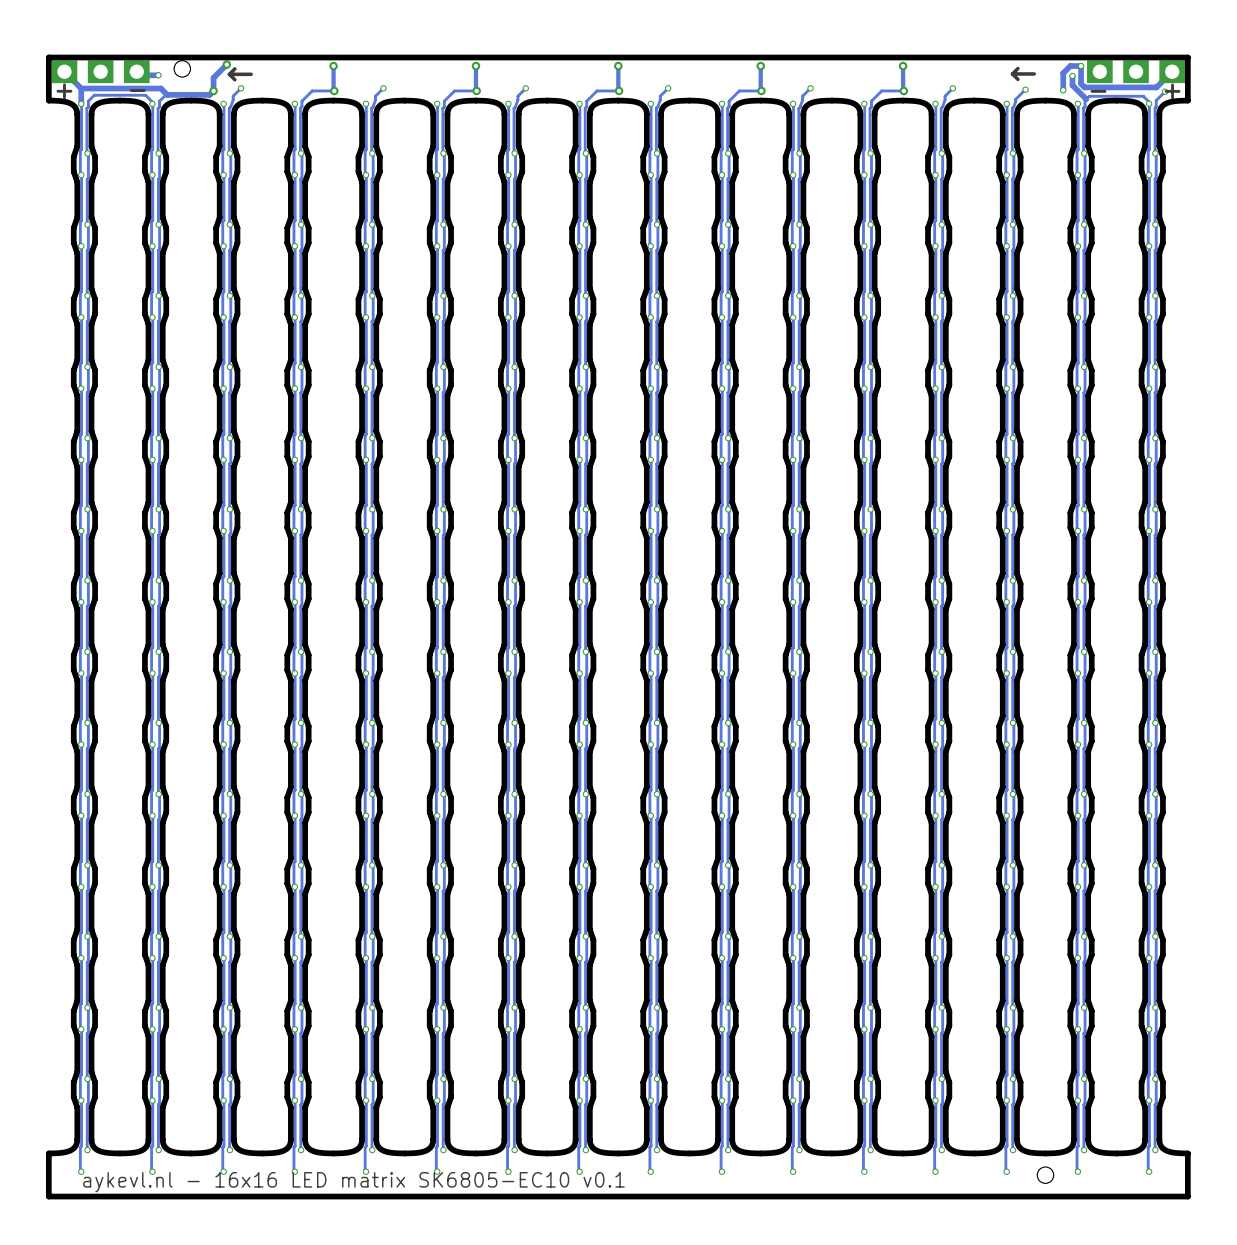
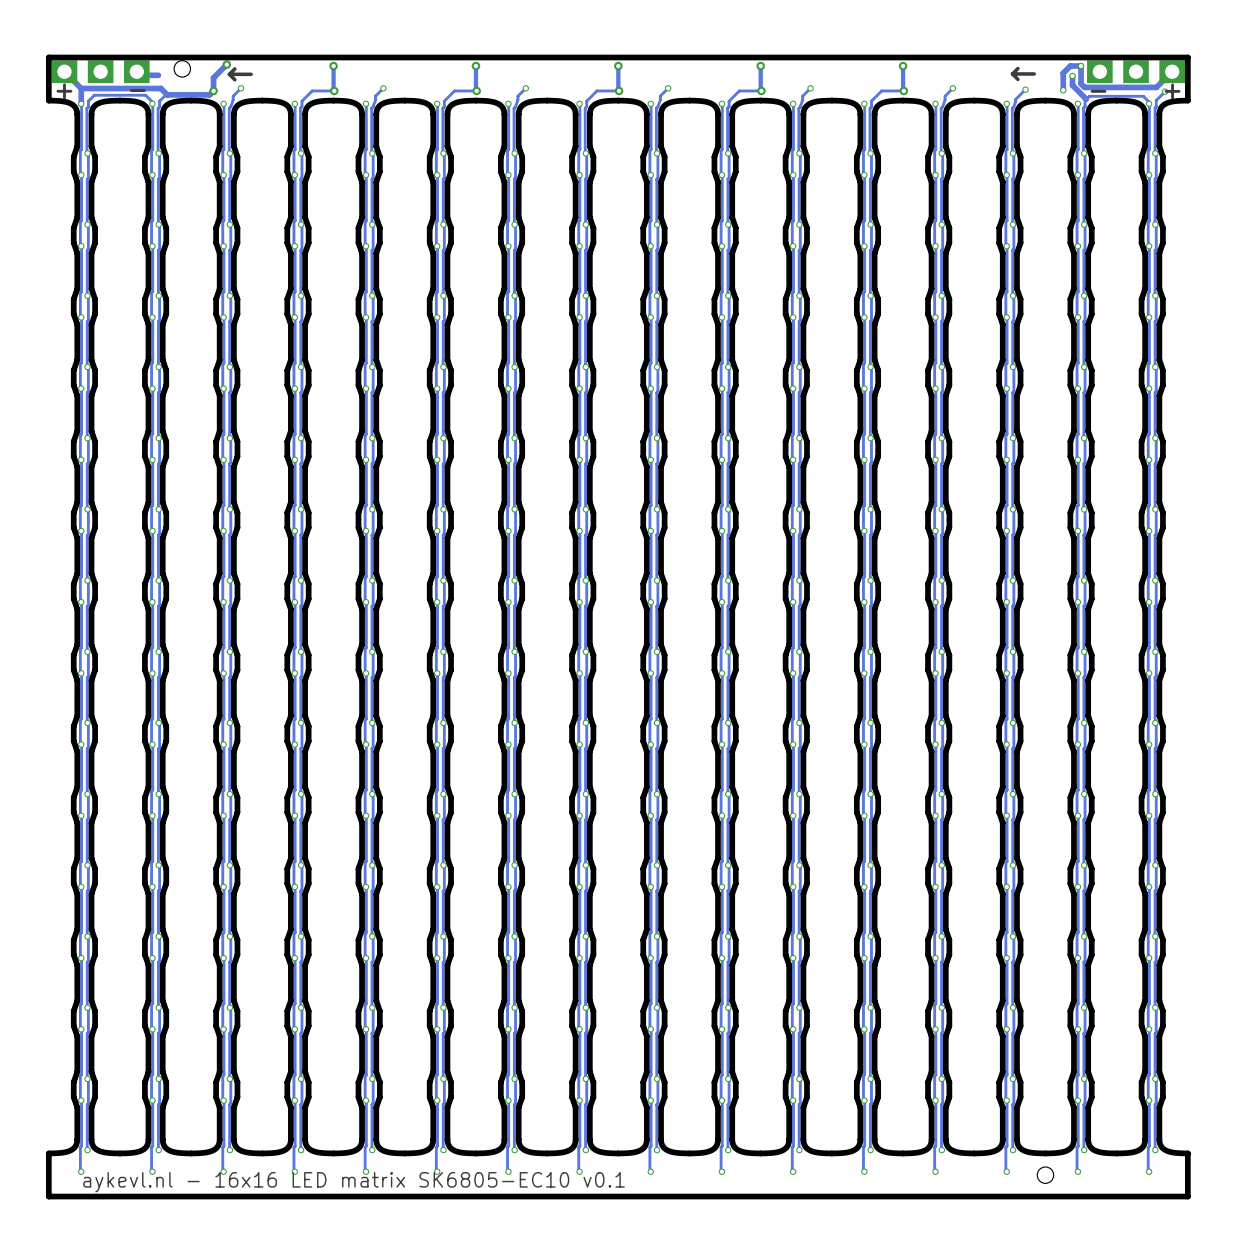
via: (158, 75) -> none

